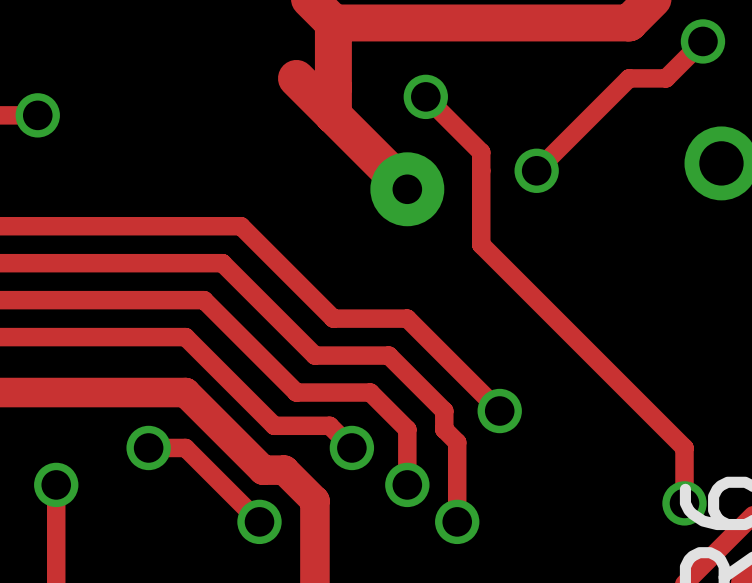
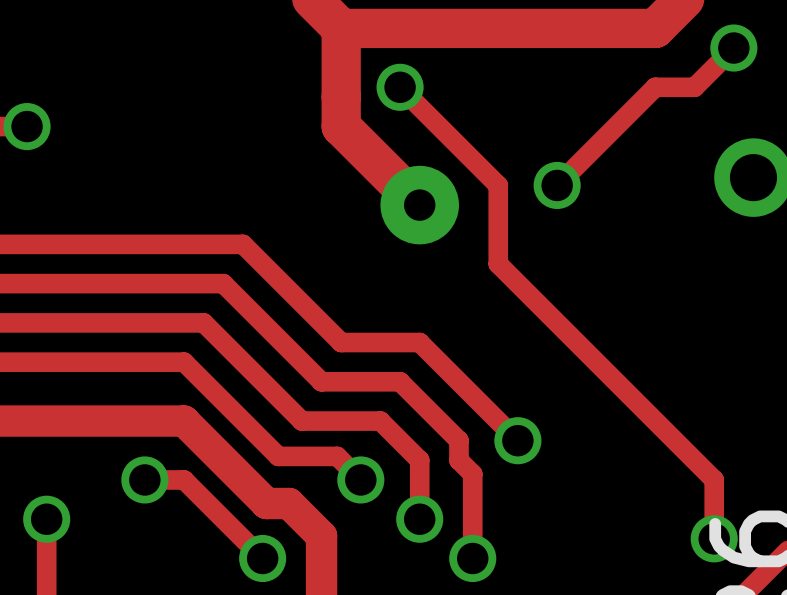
track: (296, 78) (333, 115) -> none
track: (425, 96) (481, 152) (481, 170) -> (400, 87) (498, 185)
via position: (425, 96) -> (400, 87)

